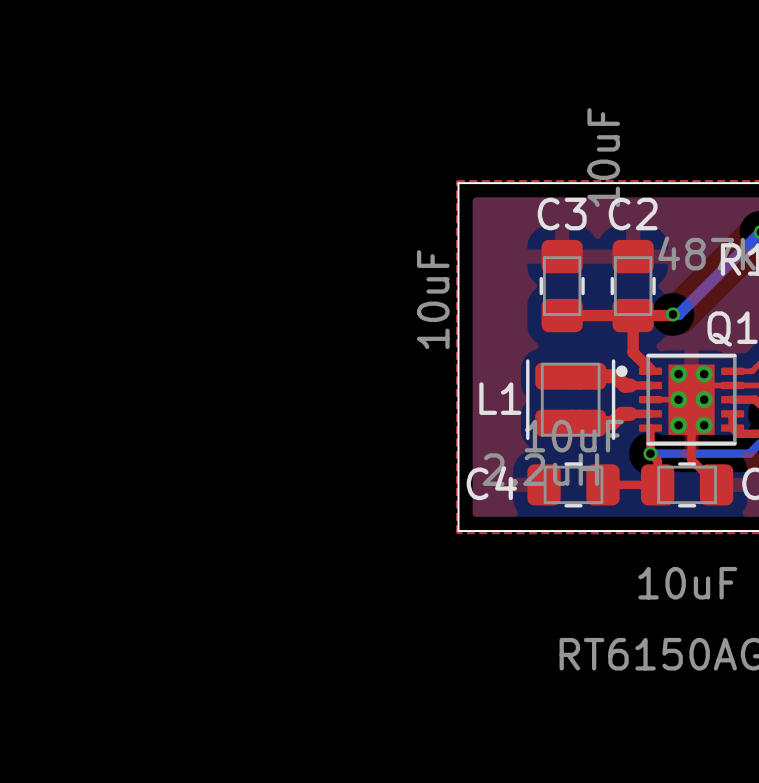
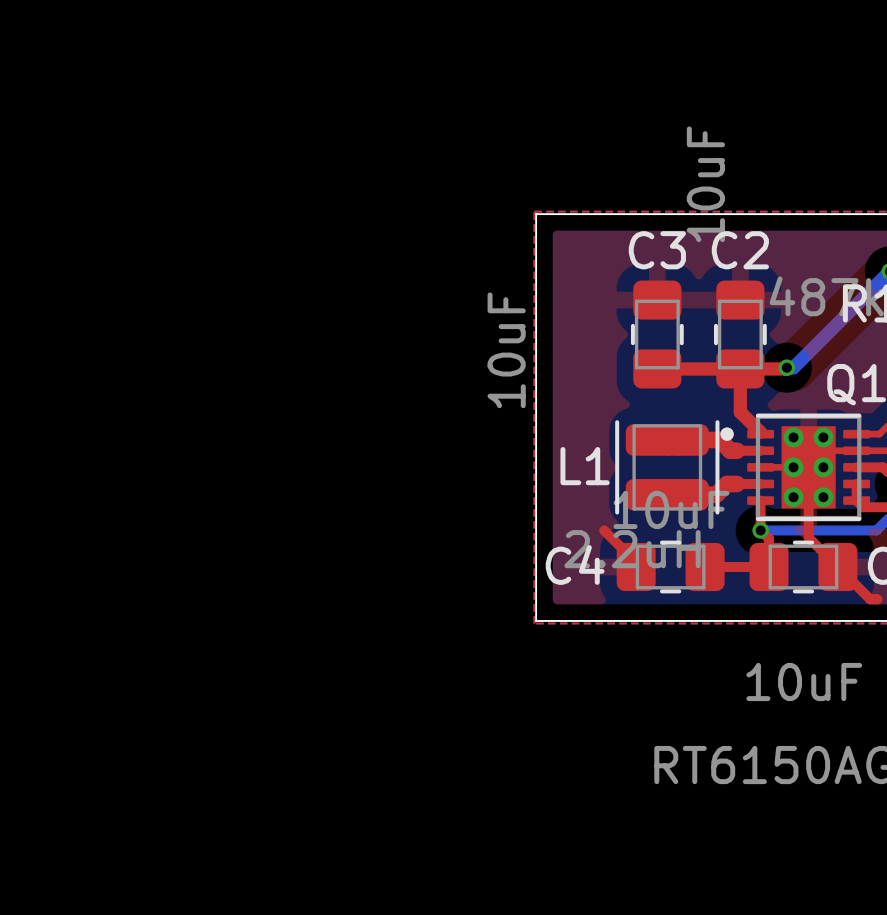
top track: none -> (604, 530) (636, 562) (636, 567)
top track: none -> (840, 567) (837, 567) (870, 599) (877, 599)

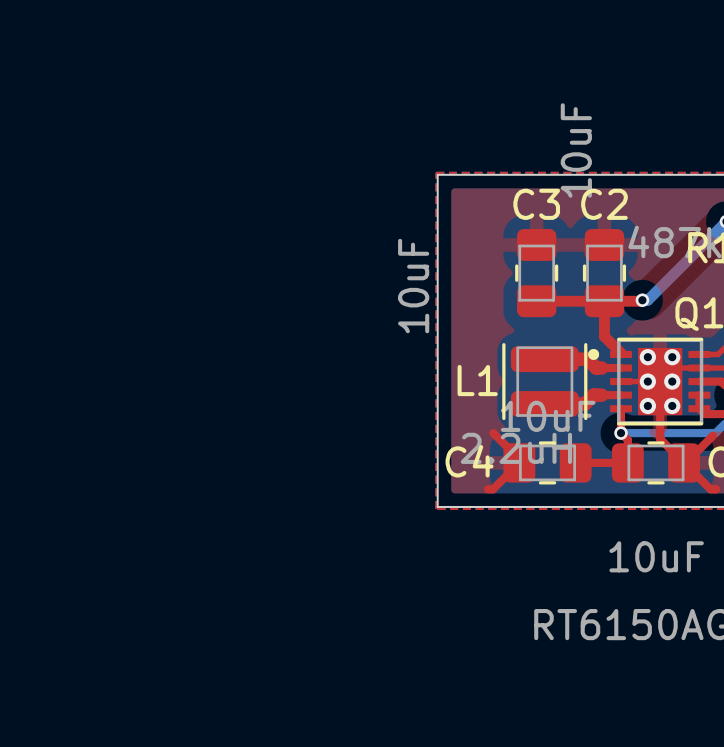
top track: none -> (712, 435) (685, 462)
top track: none -> (519, 462) (492, 489) (487, 489)

